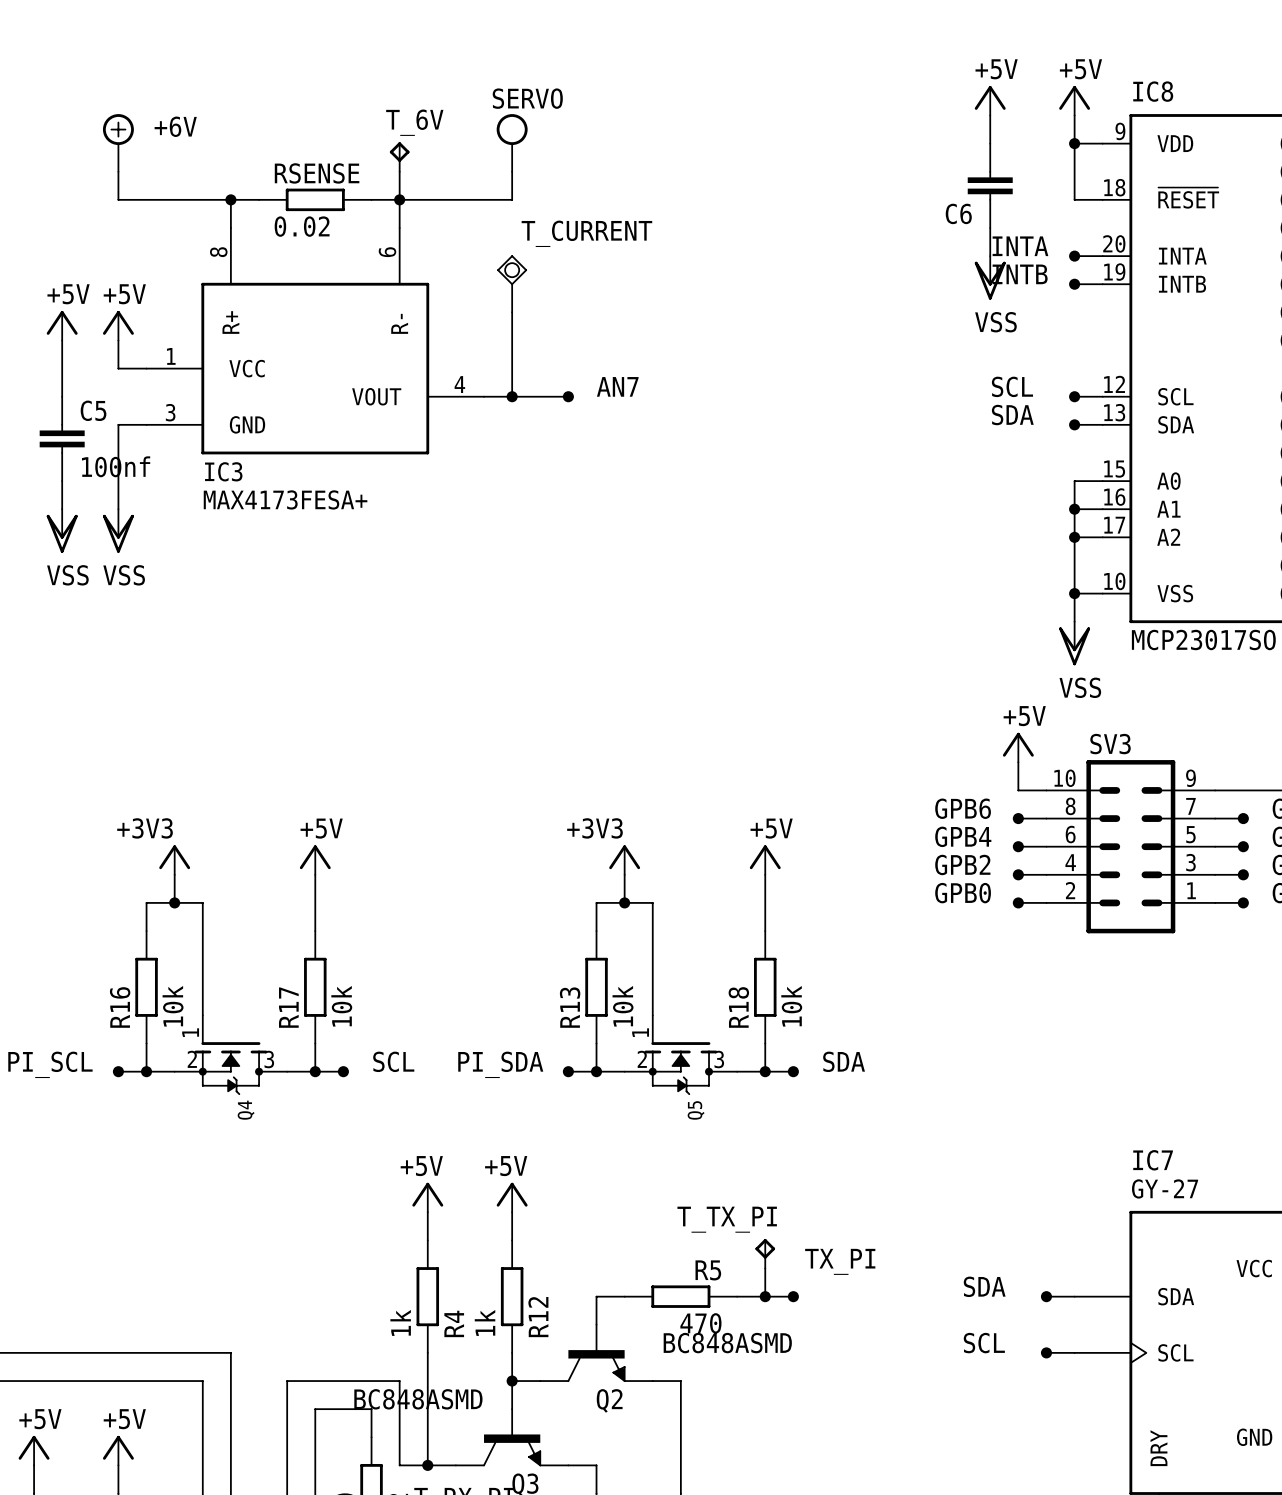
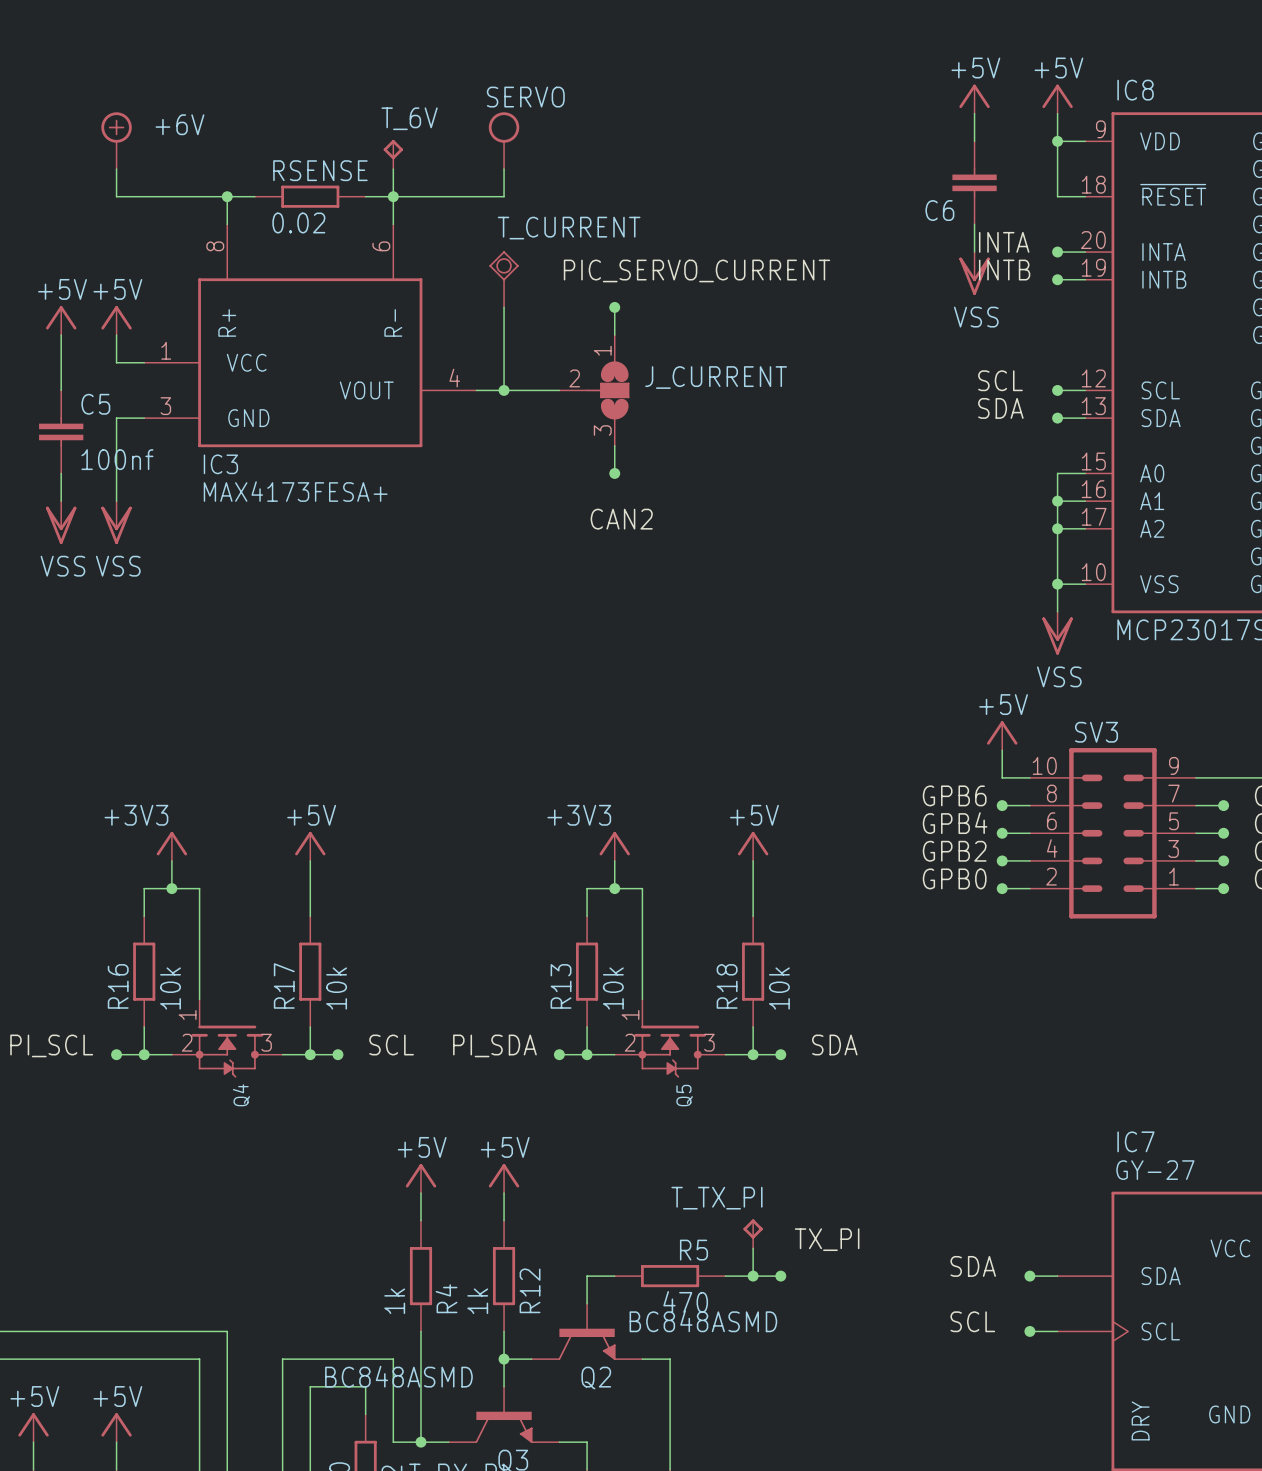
label: none -> PIC_SERVO_CURRENT (696, 270)
wire: none -> (614, 307) (614, 335)
junction: none -> (614, 307)
label: AN7 (617, 386) -> none
junction: (568, 396) -> none
J_CURRENT: none -> (594, 390)
wire: none -> (614, 445) (614, 473)
junction: none -> (614, 473)
label: none -> CAN2 (621, 519)

